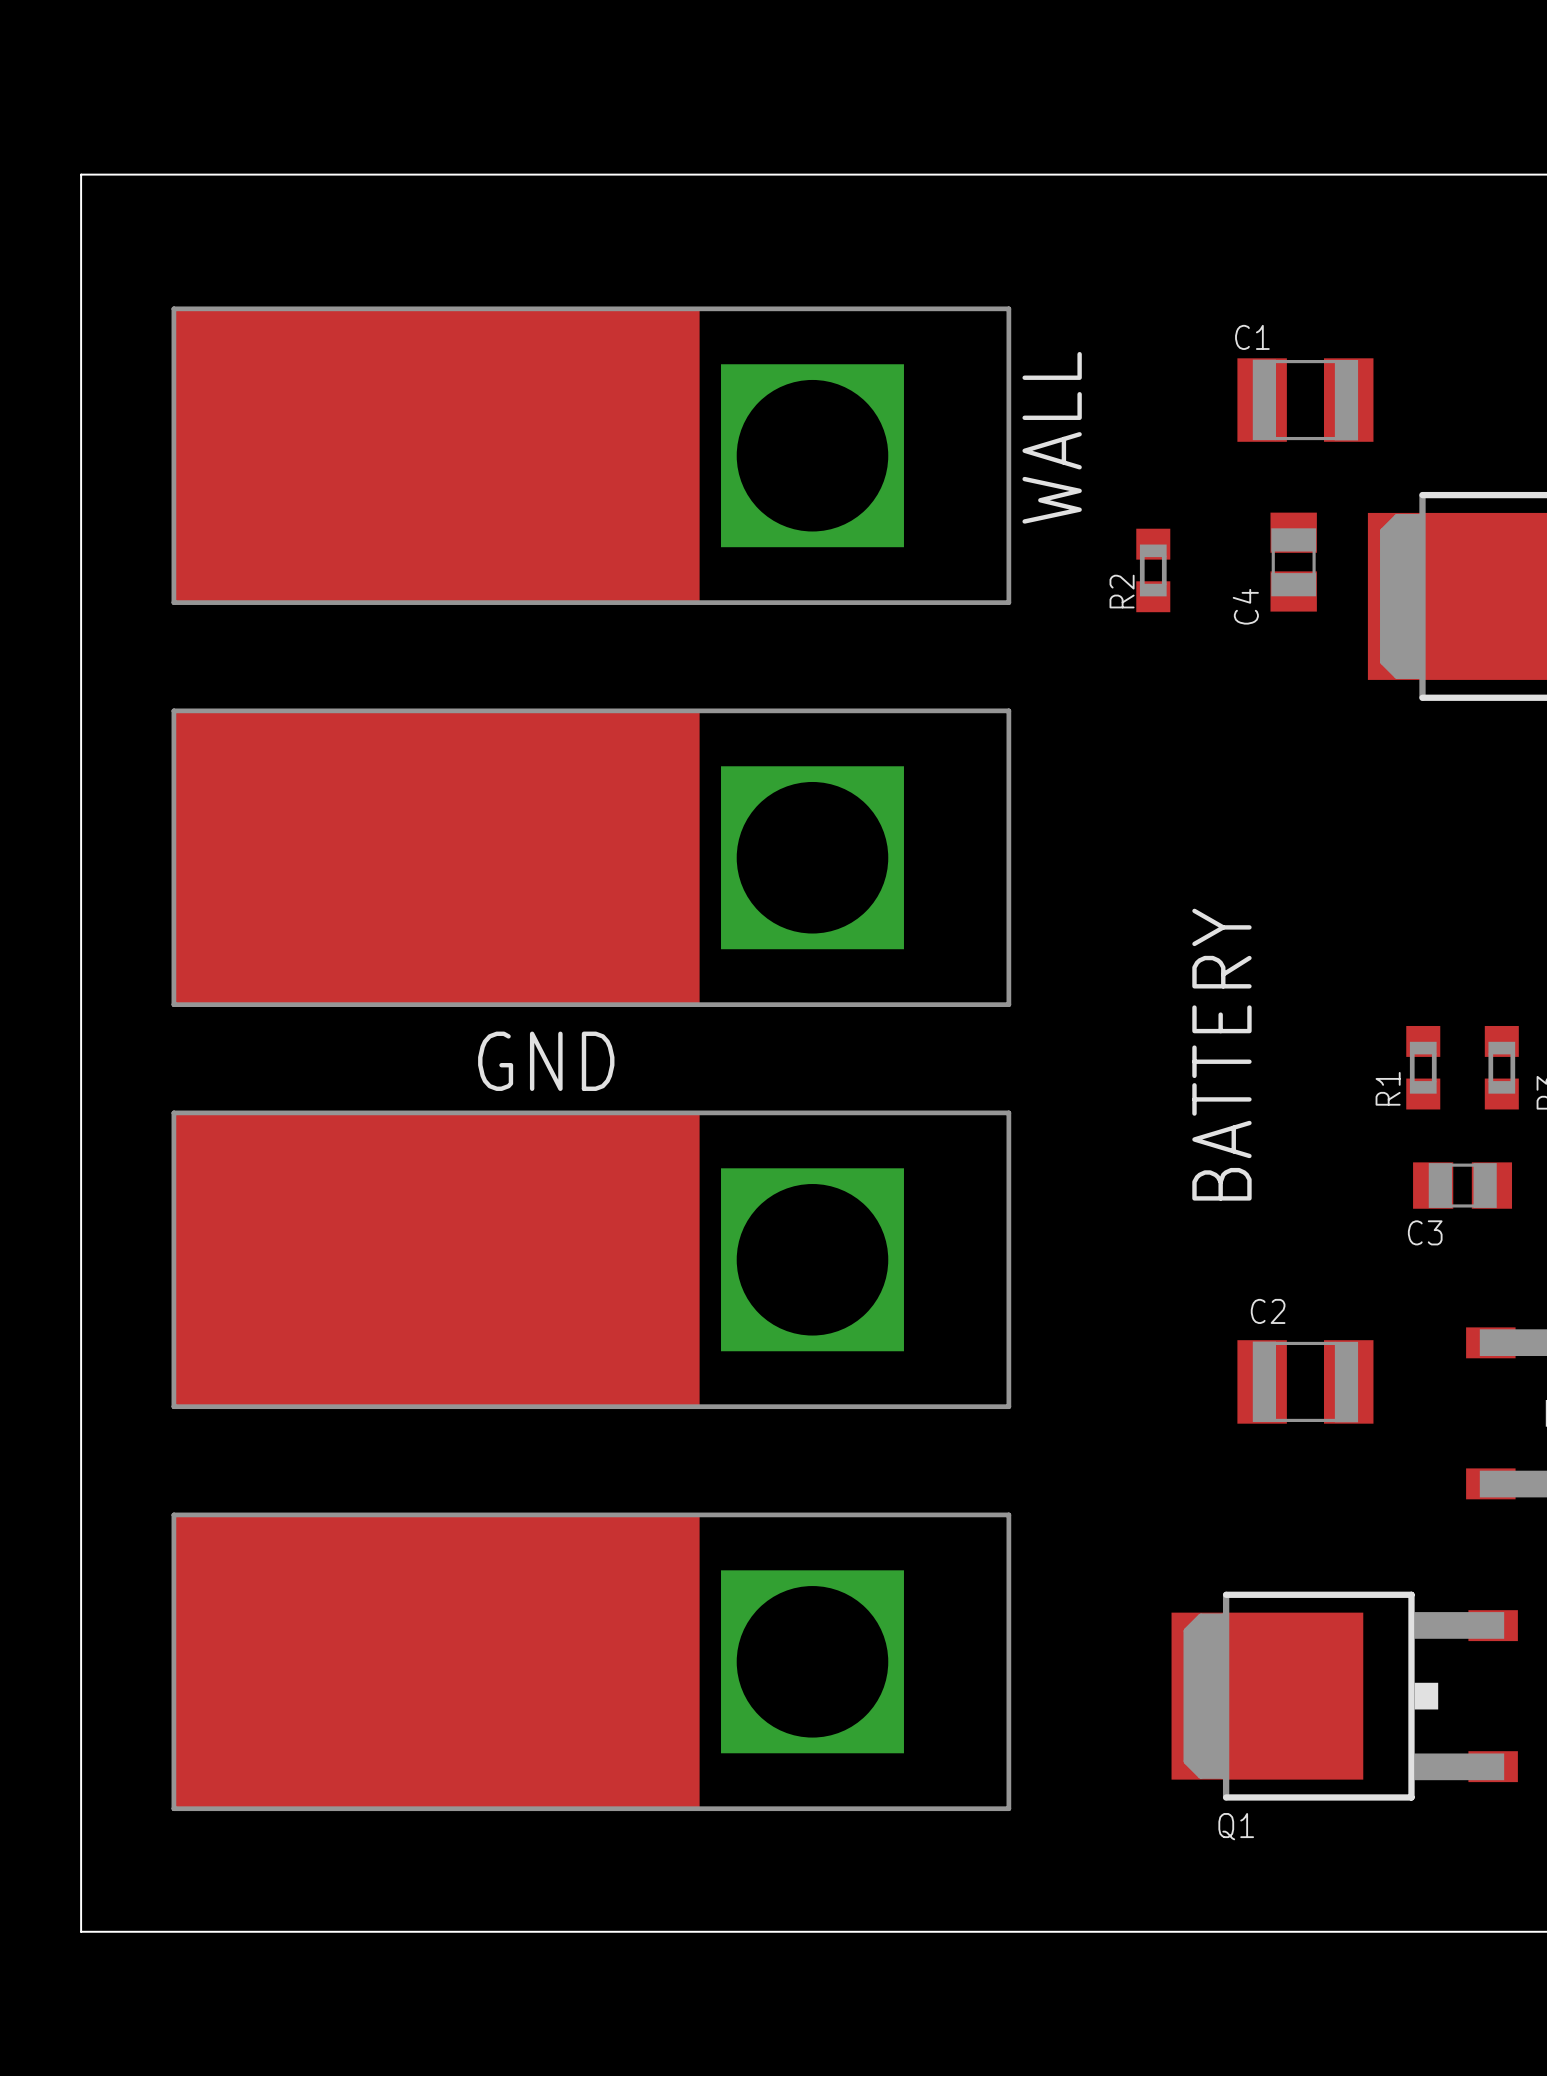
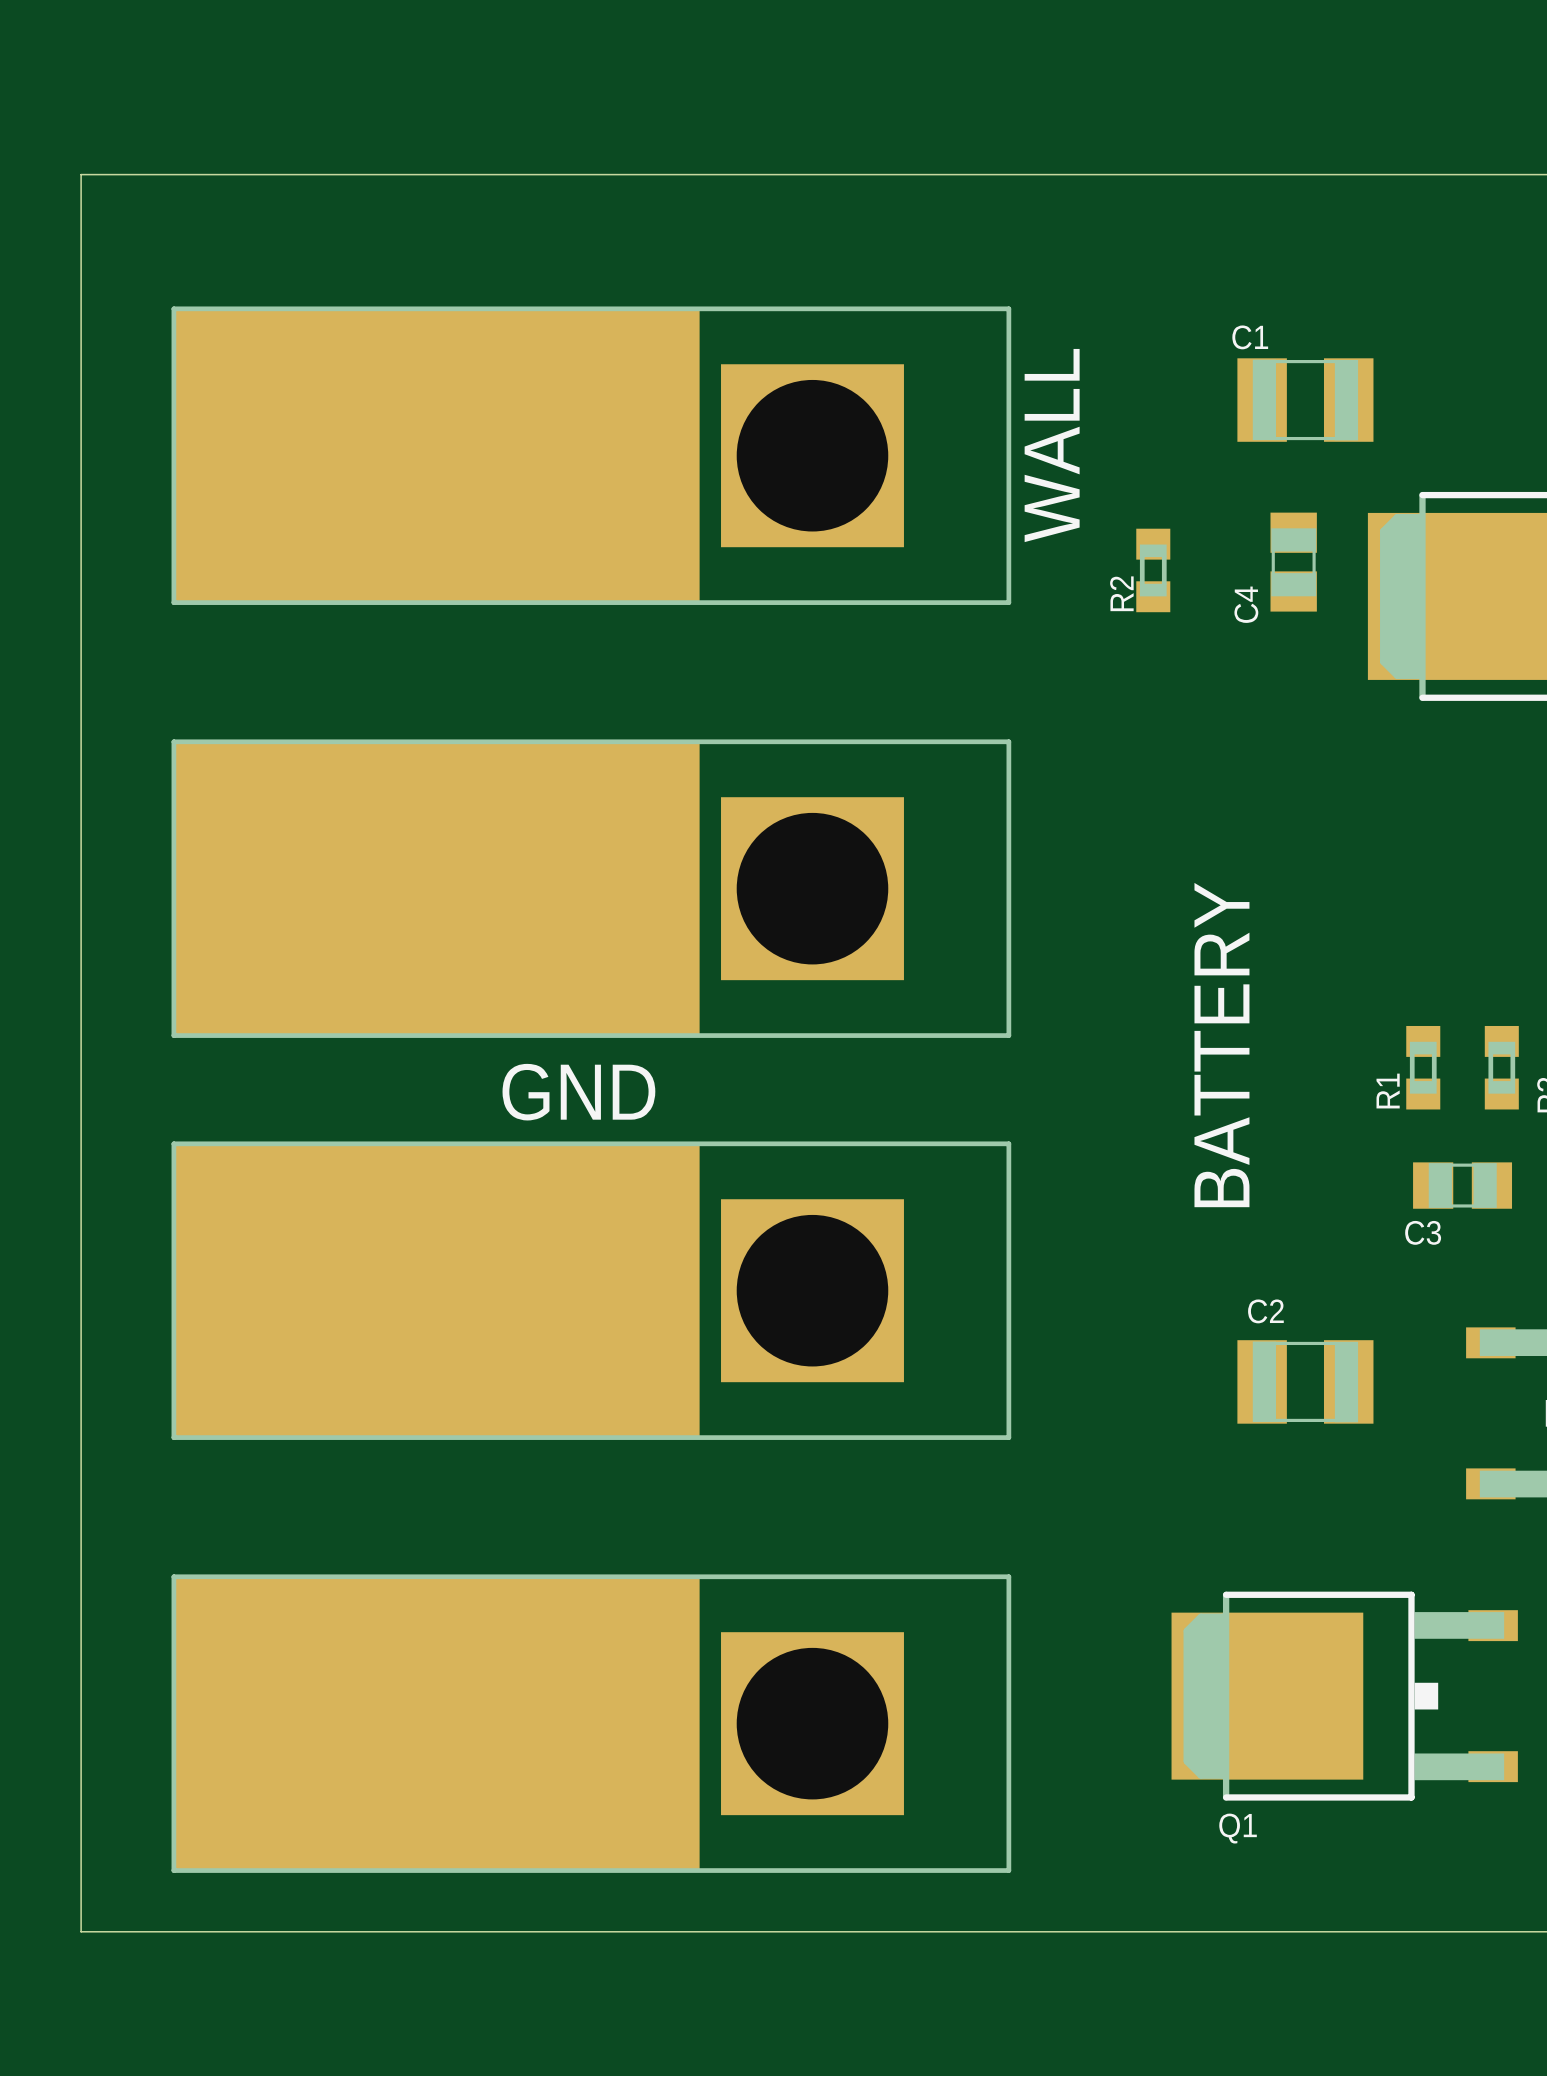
part position: (591, 857) -> (591, 888)
text position: GND (546, 1061) -> GND (578, 1092)
part position: (591, 1259) -> (591, 1290)
part position: (591, 1661) -> (591, 1723)

